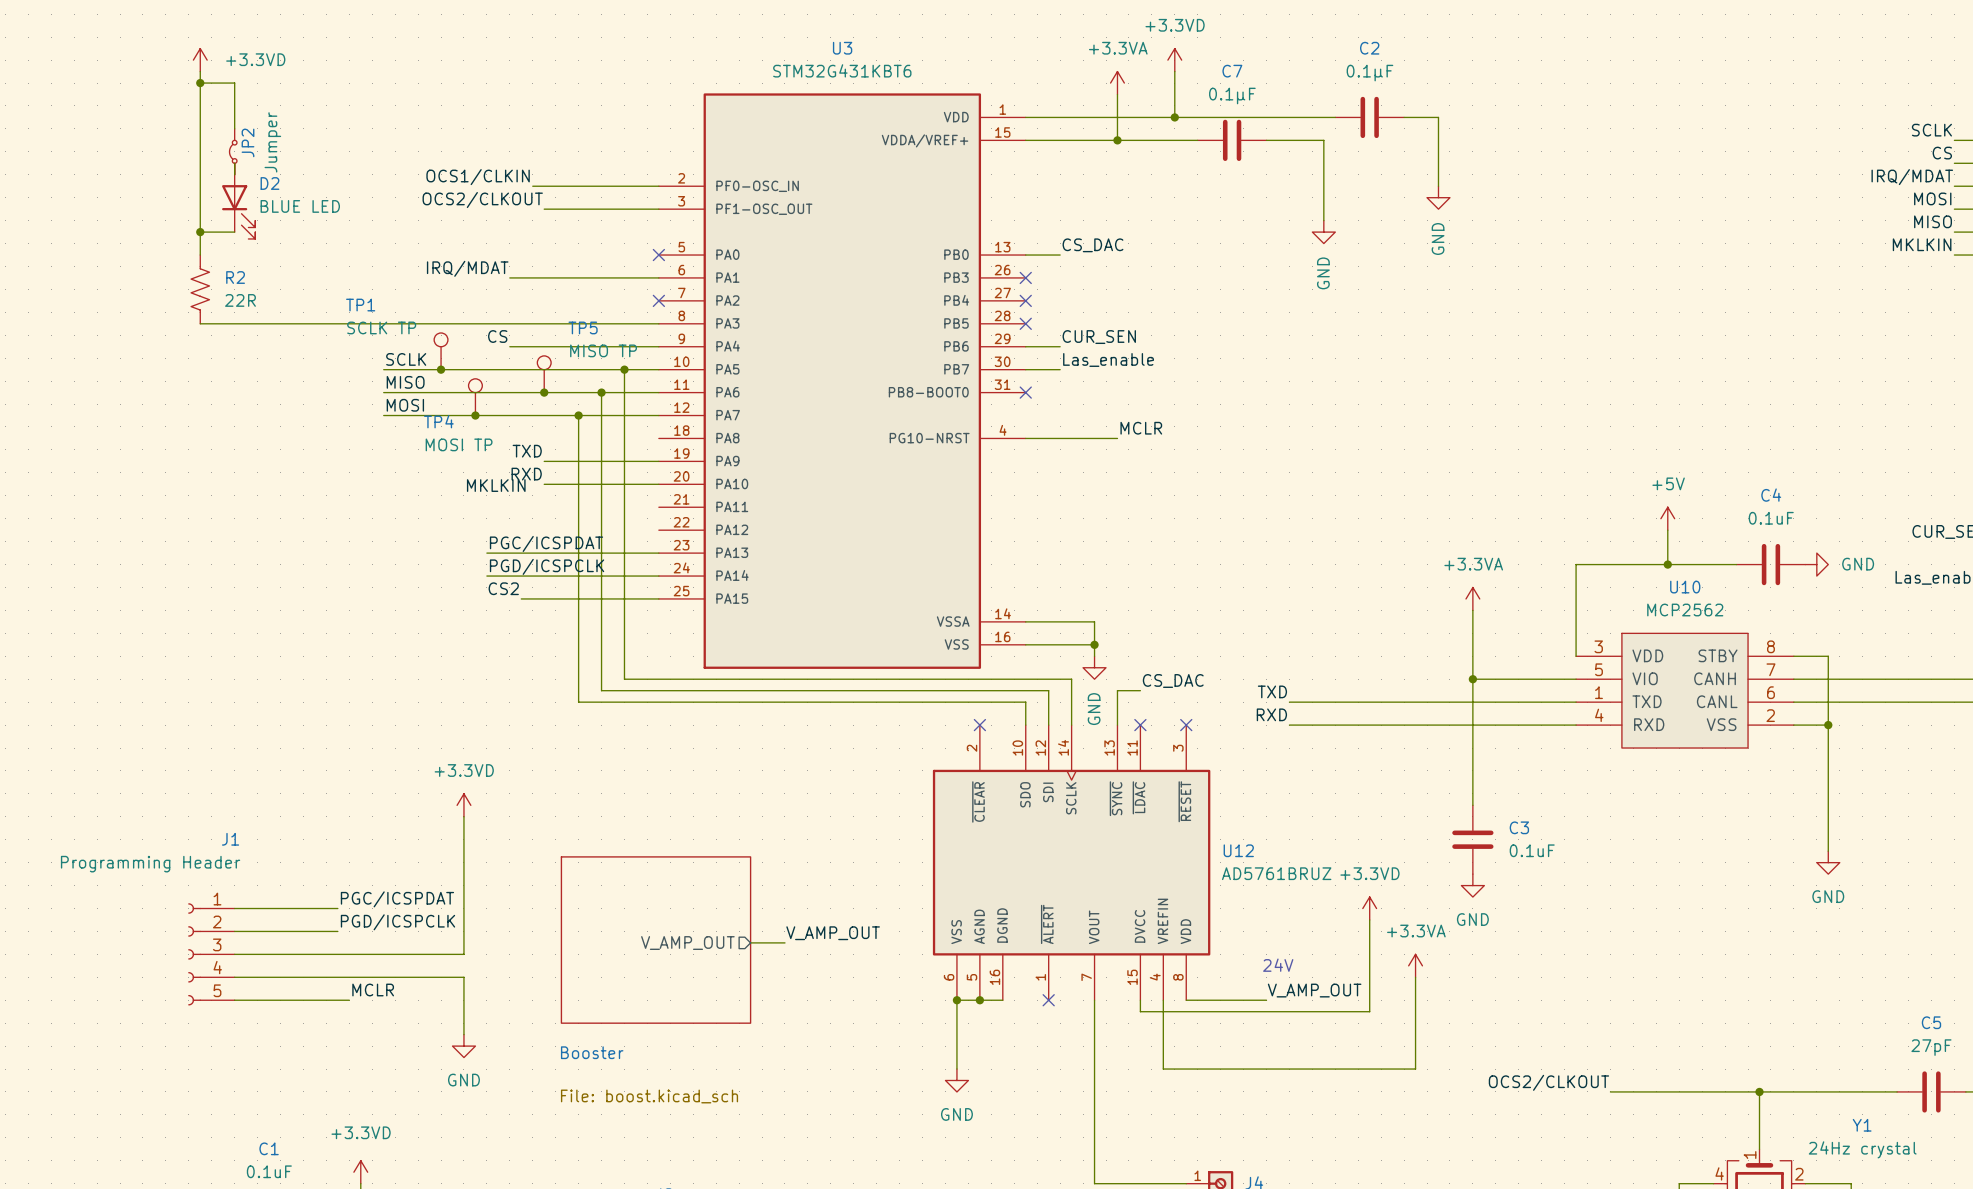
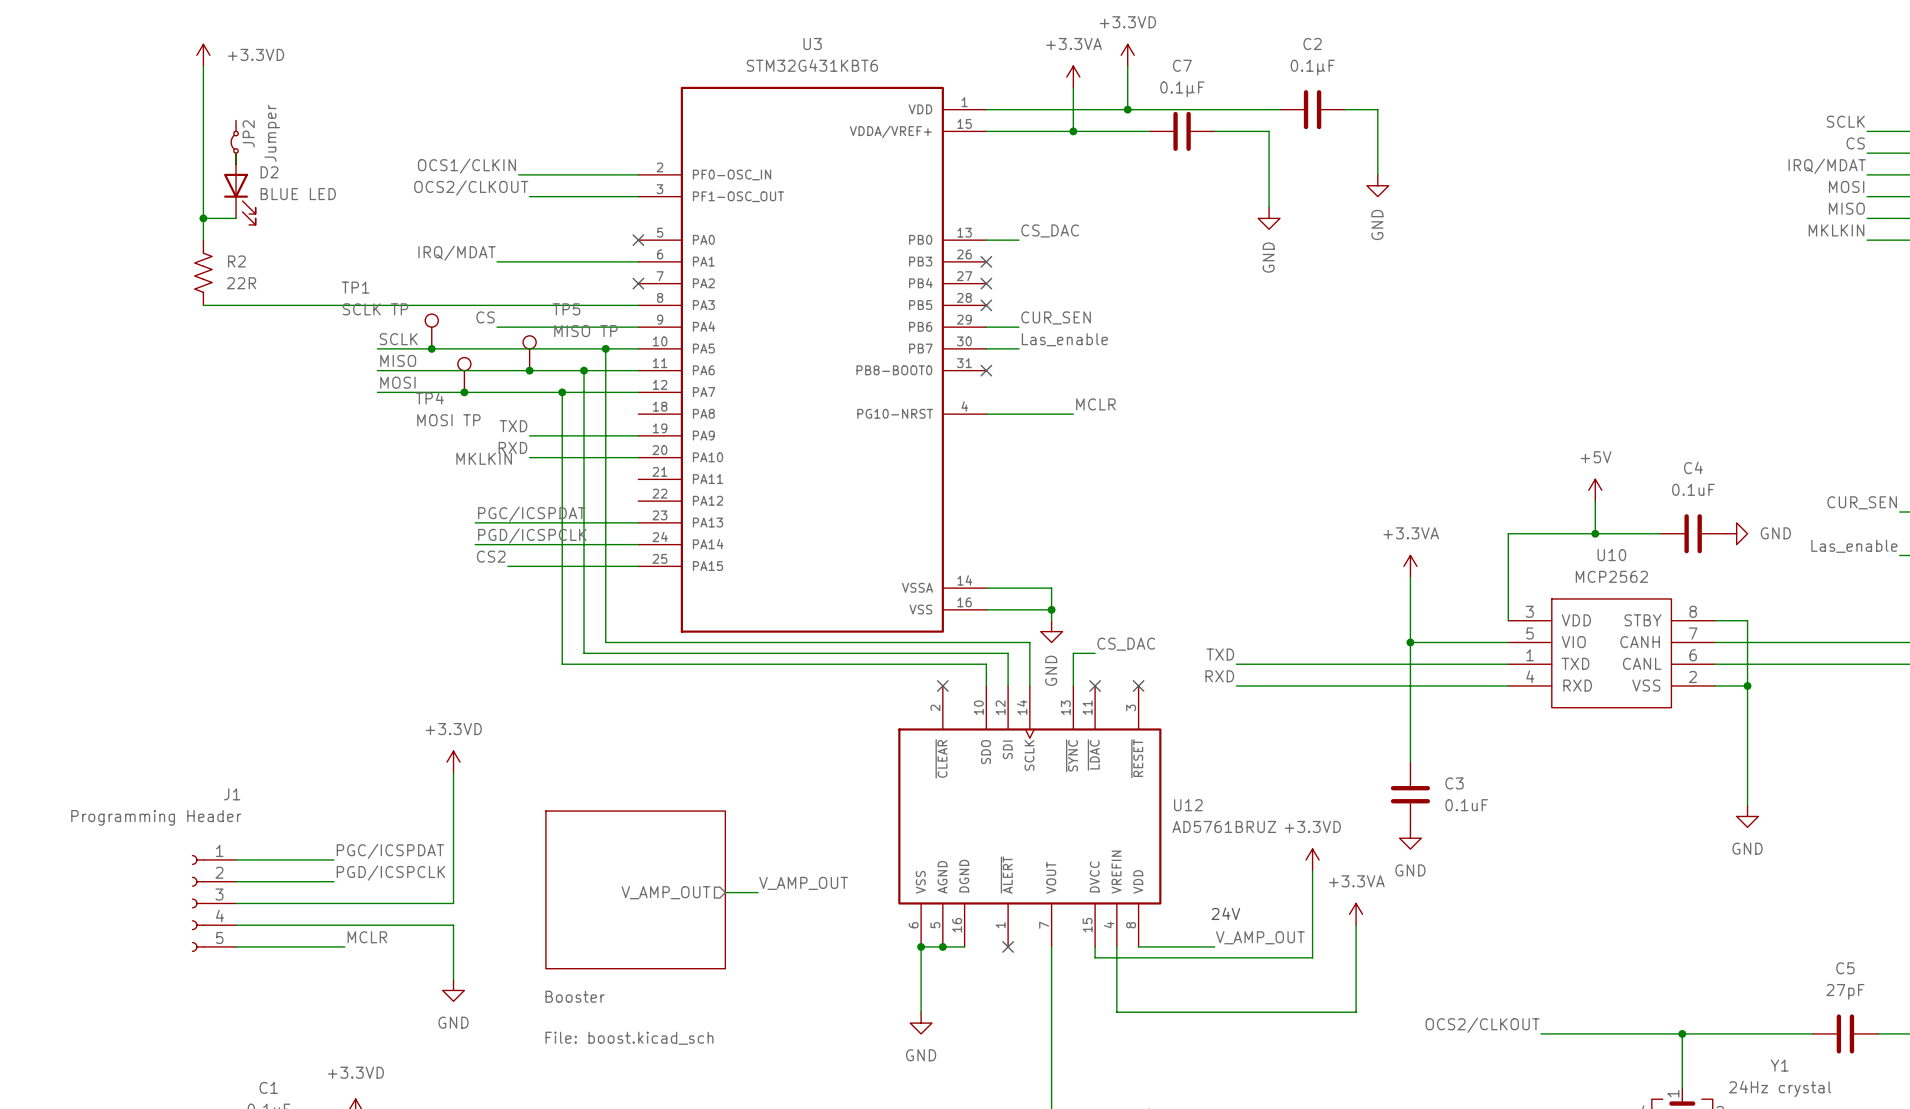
wire: (200, 83) (234, 83) (234, 128) -> none
junction: (200, 83) -> none

